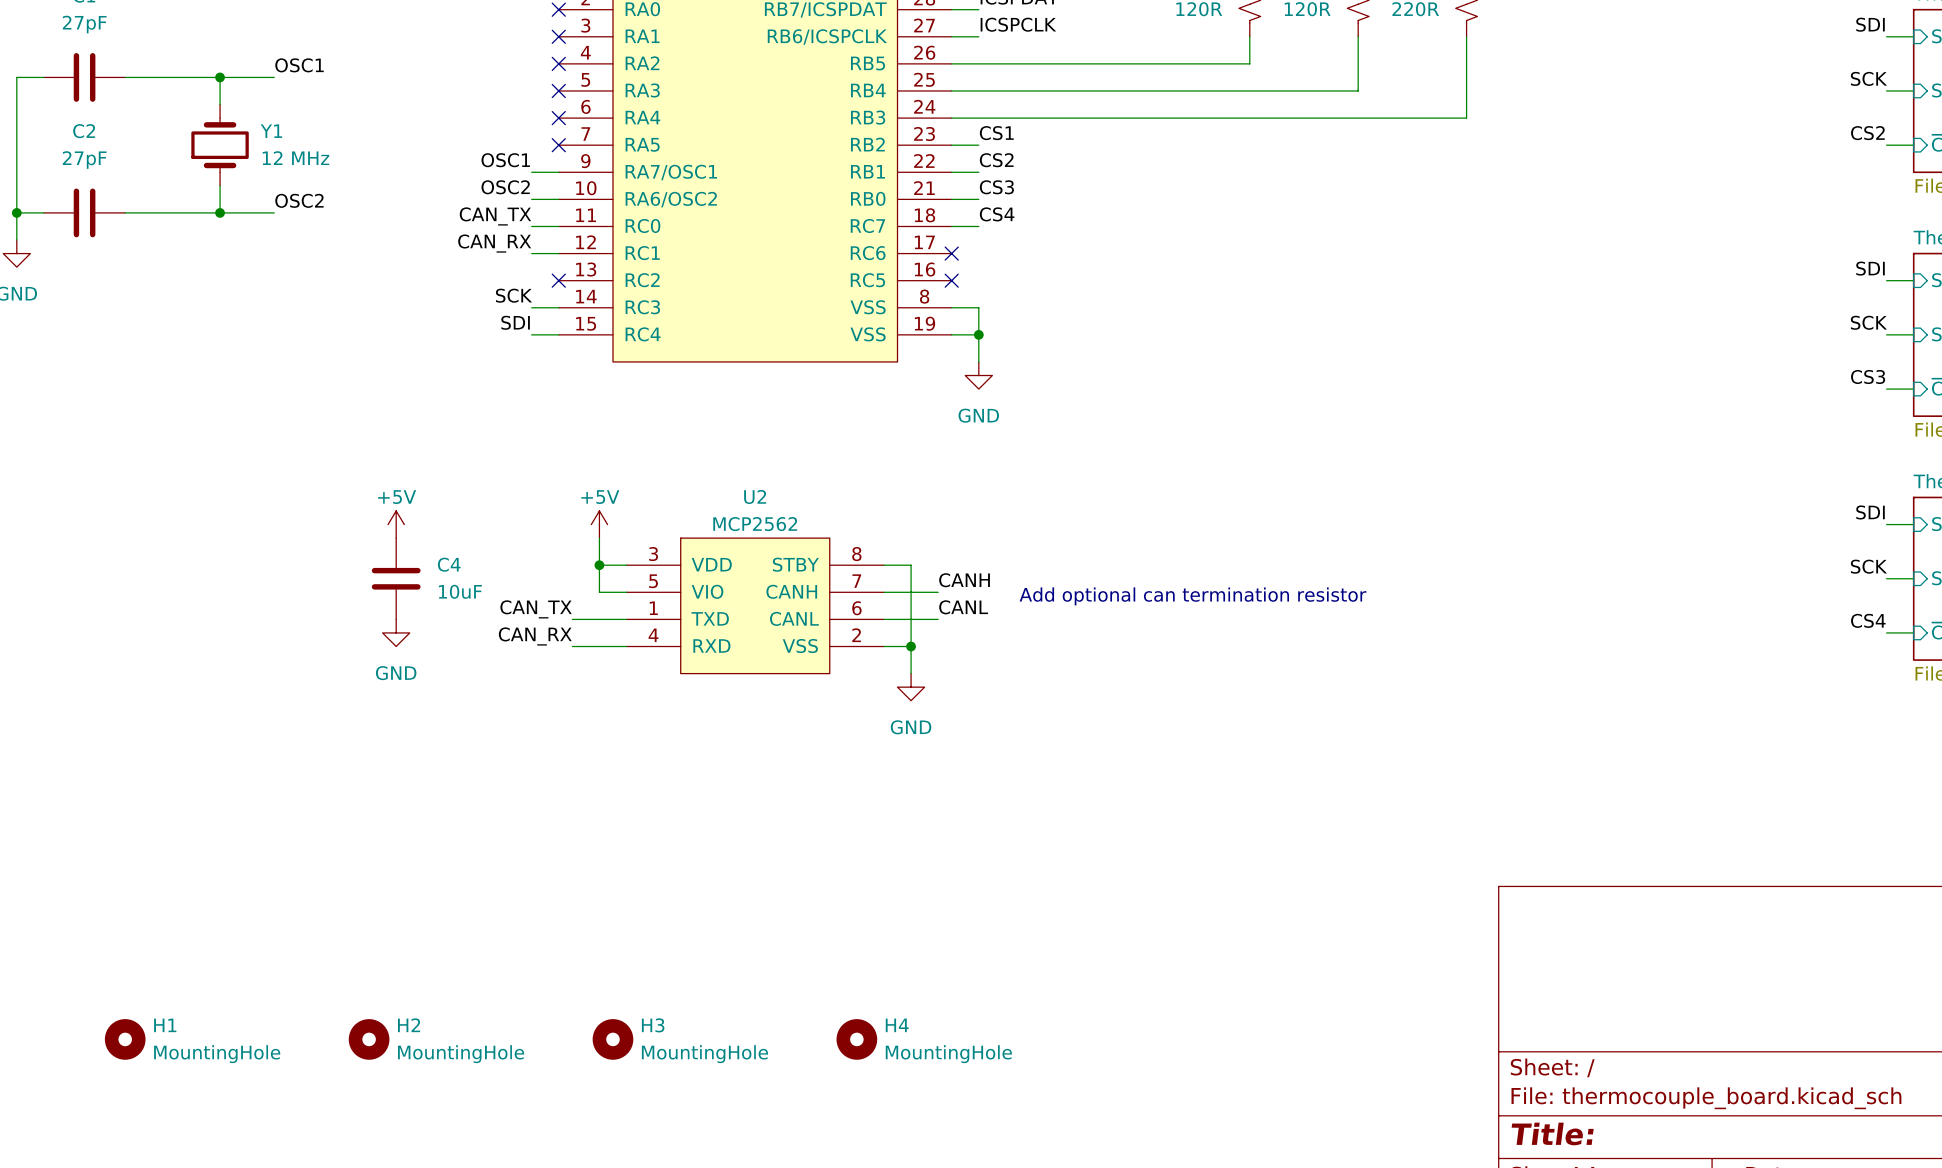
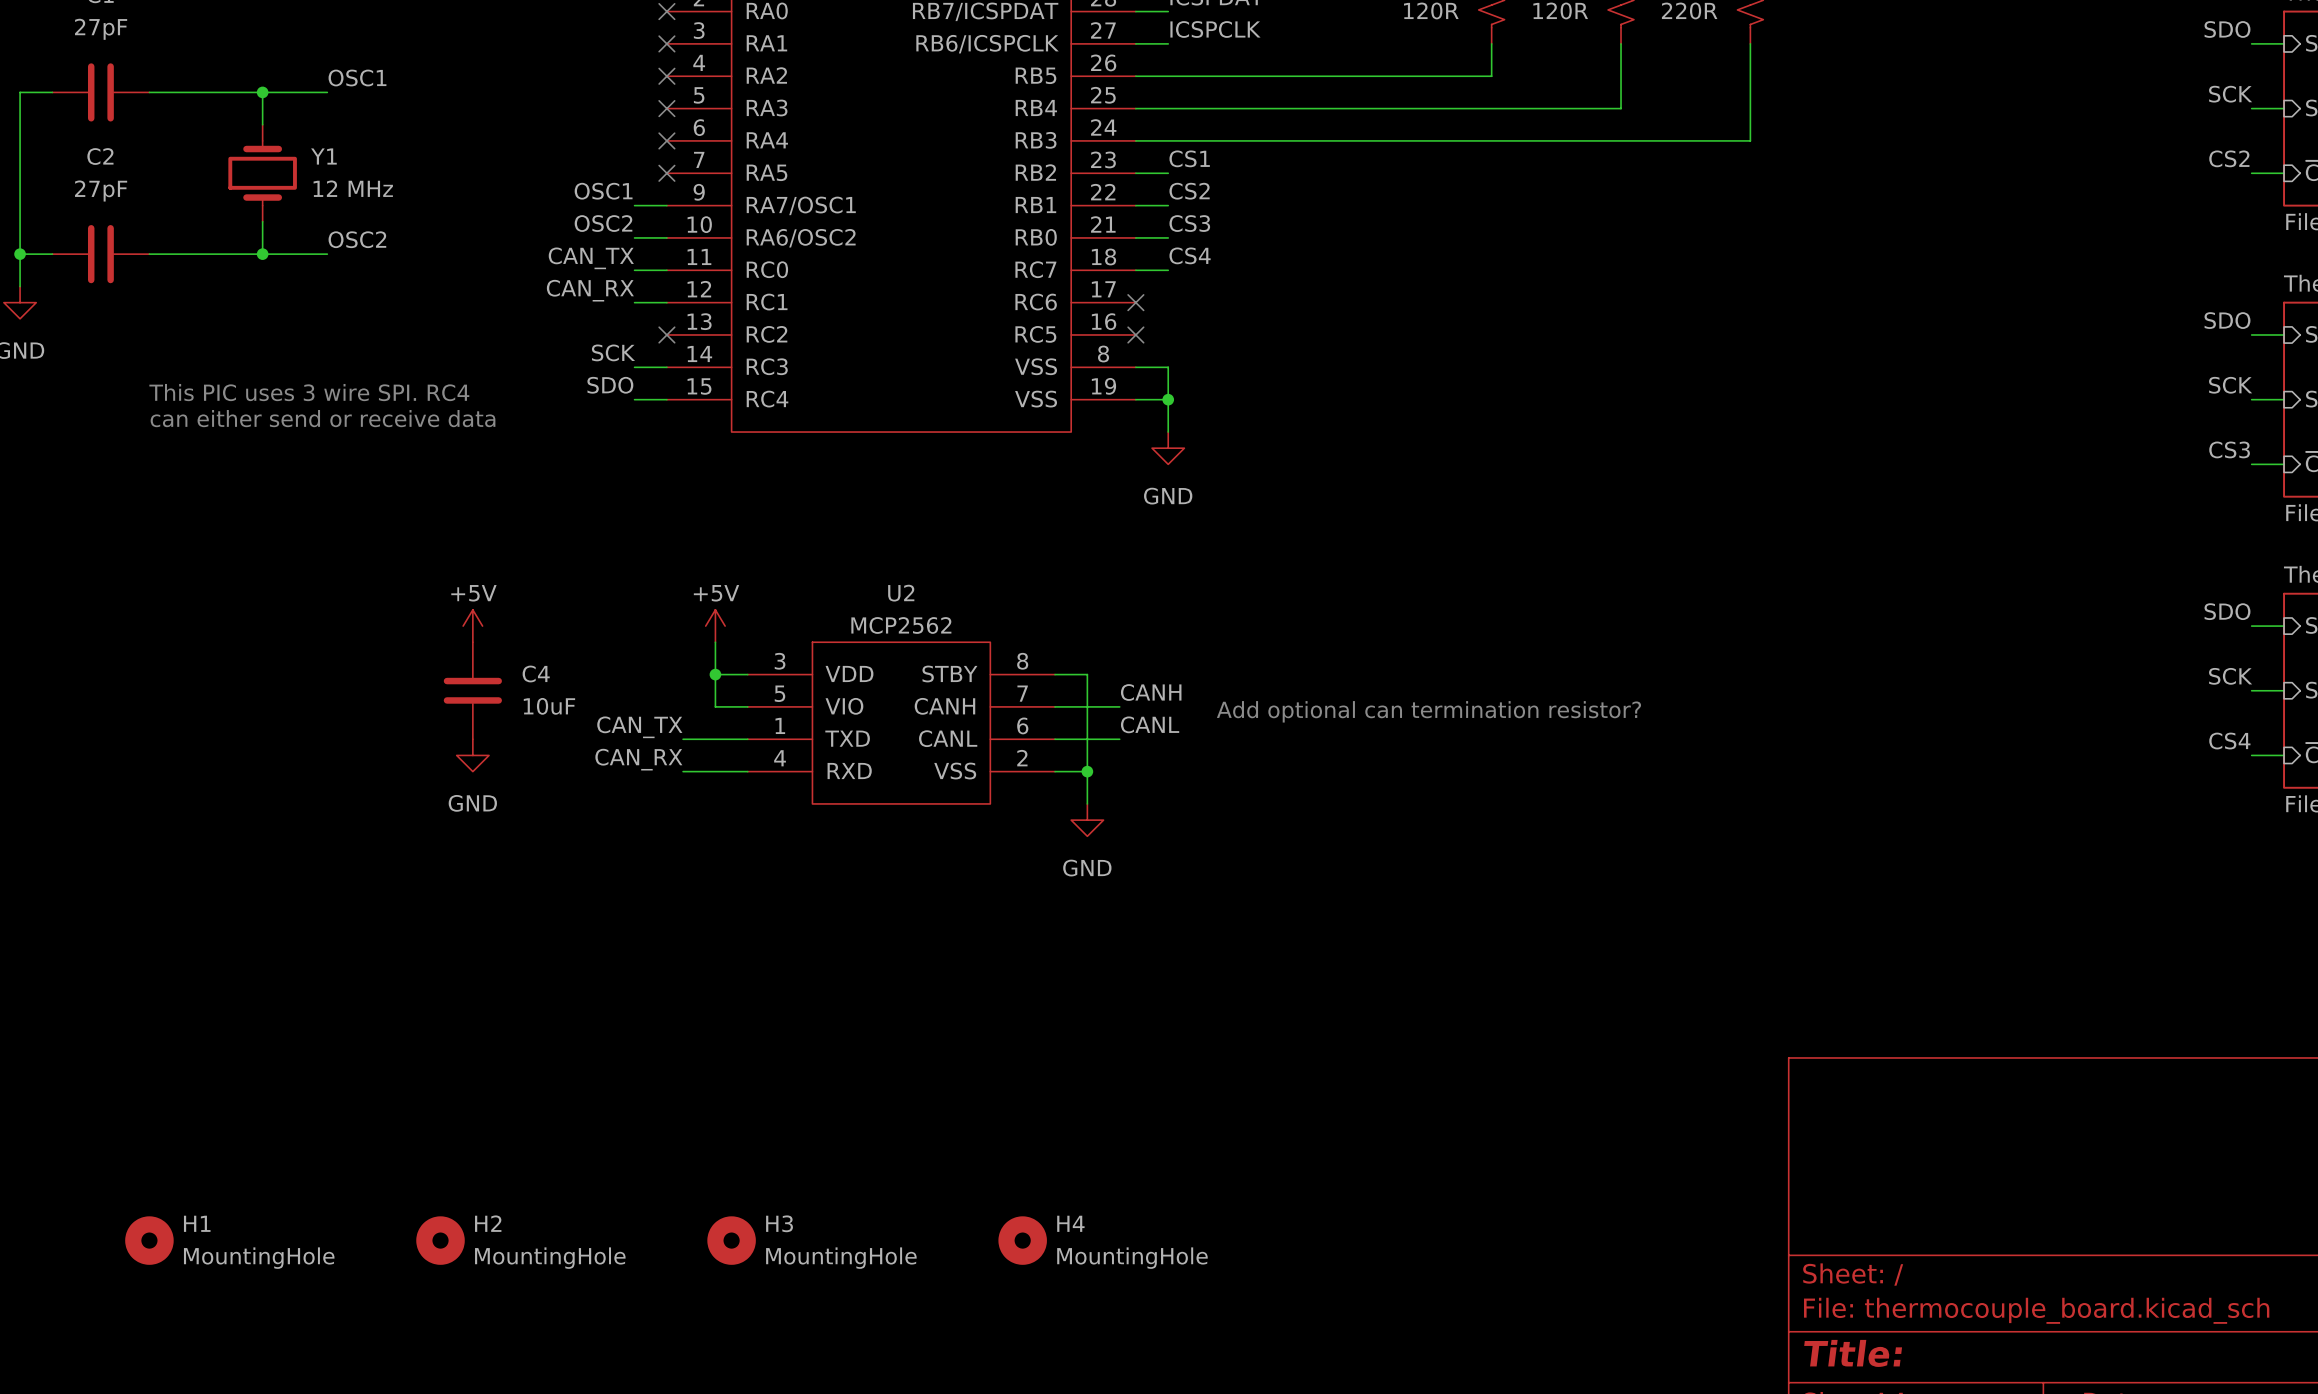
label: SDI (1870, 24) -> SDO (2227, 29)
label: SDI (1870, 268) -> SDO (2227, 320)
label: SDI (515, 322) -> SDO (610, 385)
text: none -> This PIC uses 3 wire SPI. RC4 (309, 392)
text: none -> can either send or receive data (323, 418)
label: SDI (1870, 512) -> SDO (2227, 611)
text: Add optional can termination resistor (1192, 596) -> Add optional can termination resistor? (1428, 711)

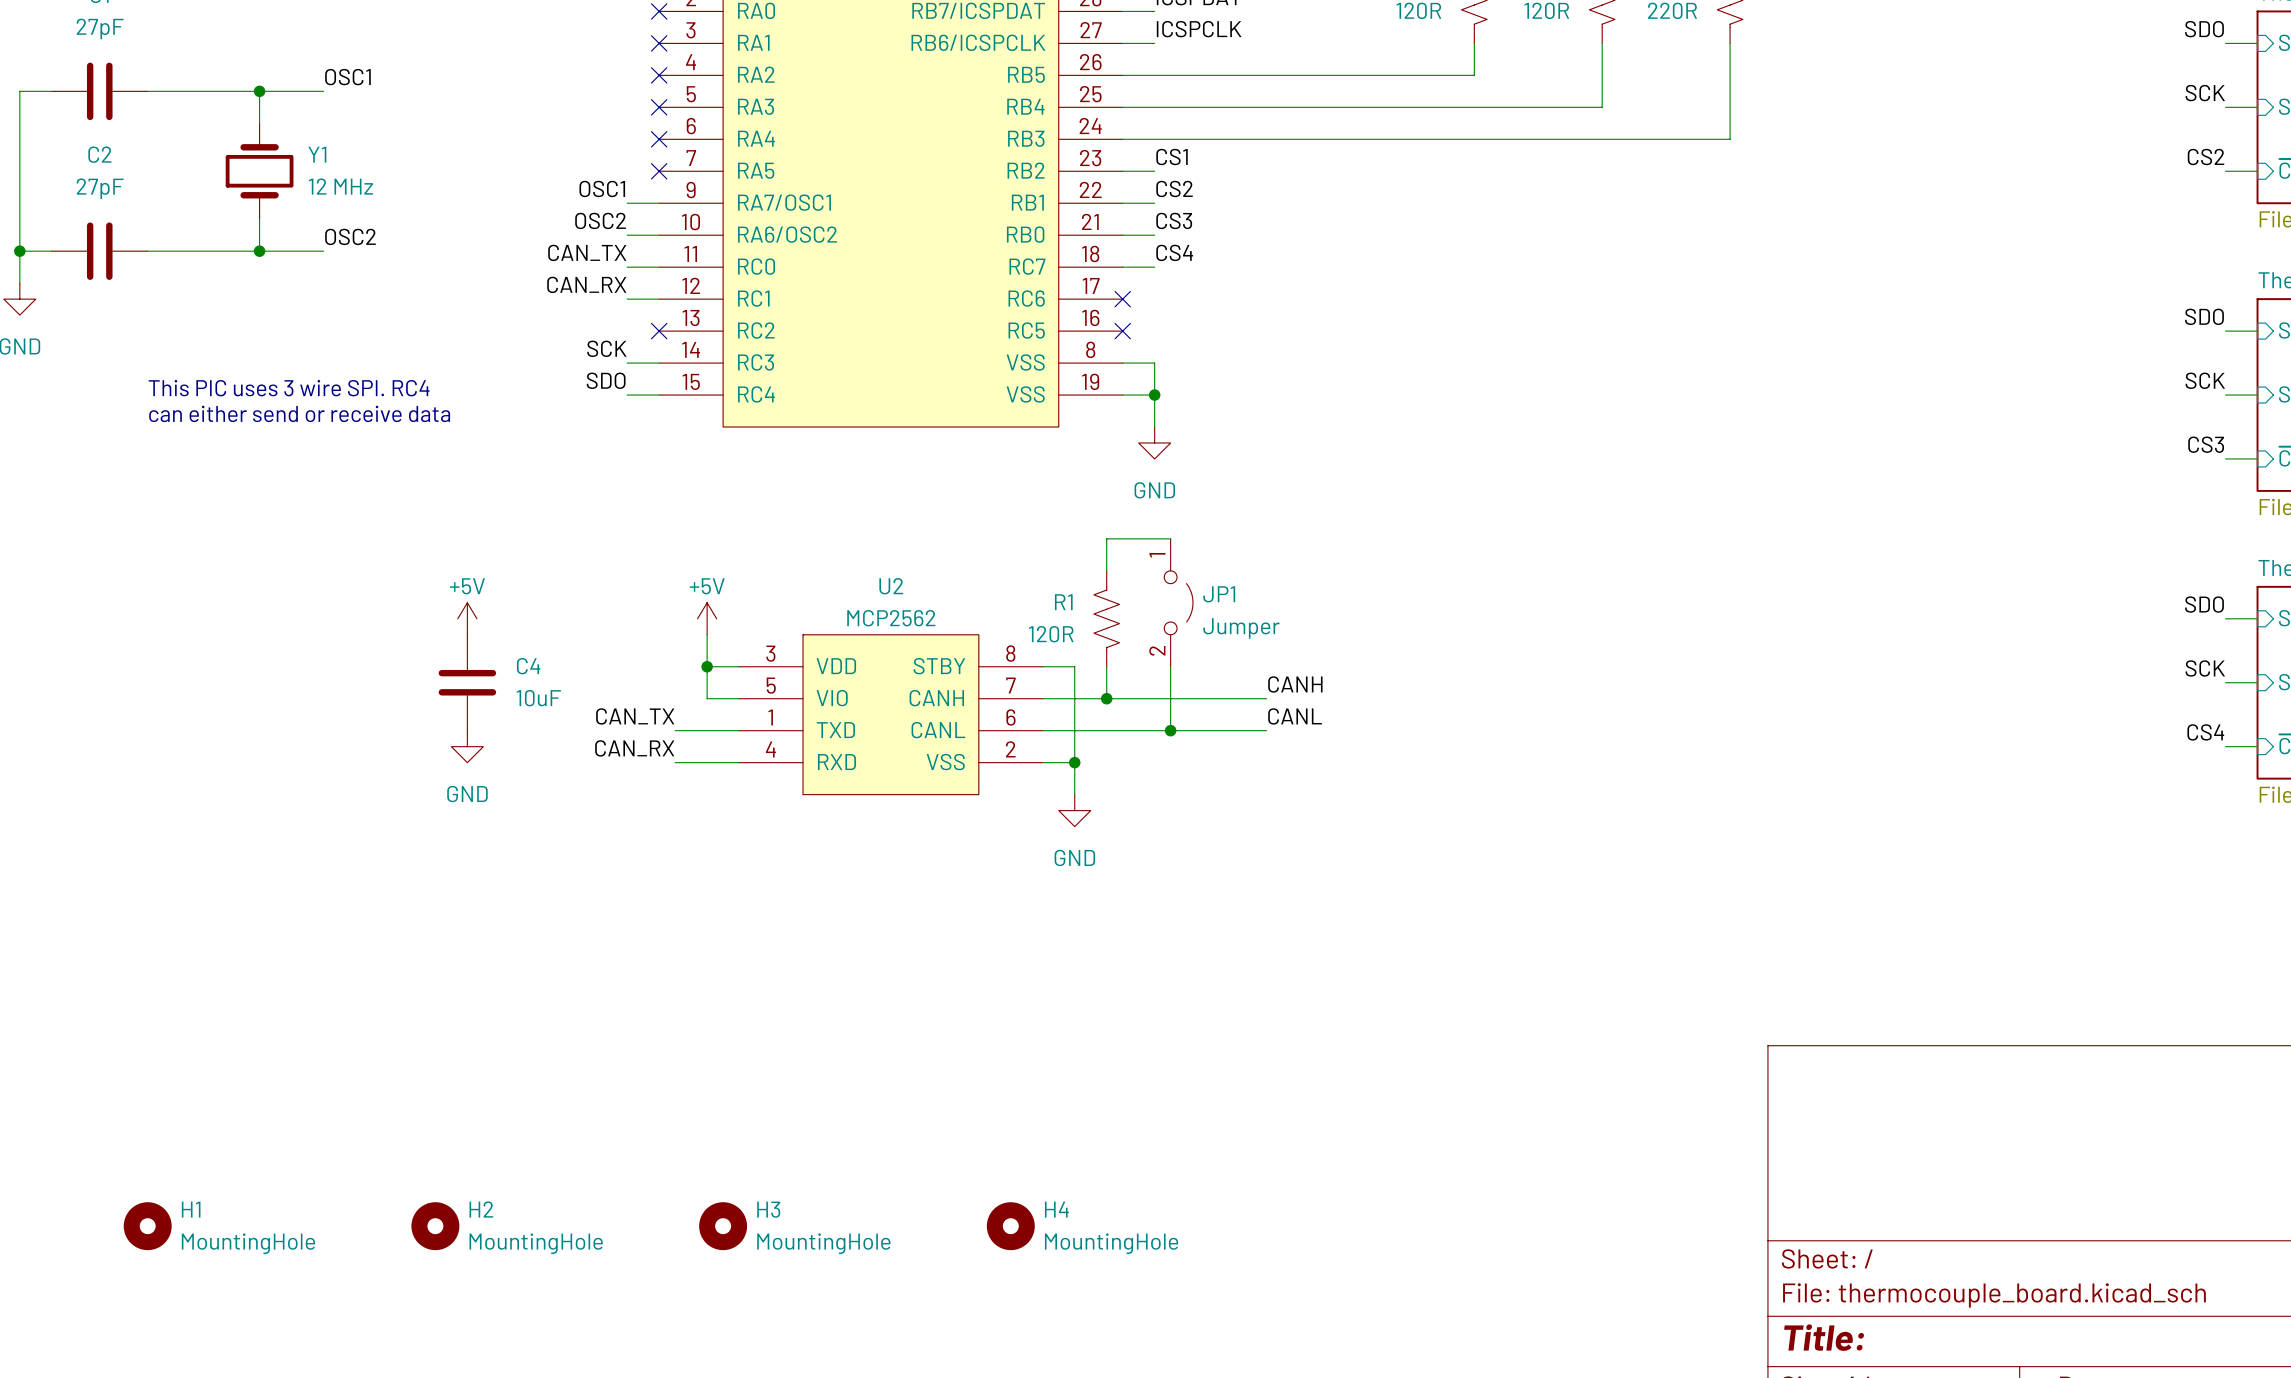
wire: none -> (1170, 538) (1106, 538) (1106, 570)
JP1: none -> Jumper (1178, 602)
R1: none -> 120R (1106, 618)
wire: none -> (1106, 666) (1106, 698) (1266, 698)
wire: none -> (1170, 666) (1170, 730)
label position: CANH (1151, 692) -> CANH (1295, 684)
junction: none -> (1106, 698)
text: Add optional can termination resistor? (1428, 711) -> none
label position: CANL (1150, 724) -> CANL (1295, 716)
wire: none -> (1106, 730) (1266, 730)
junction: none -> (1170, 730)

